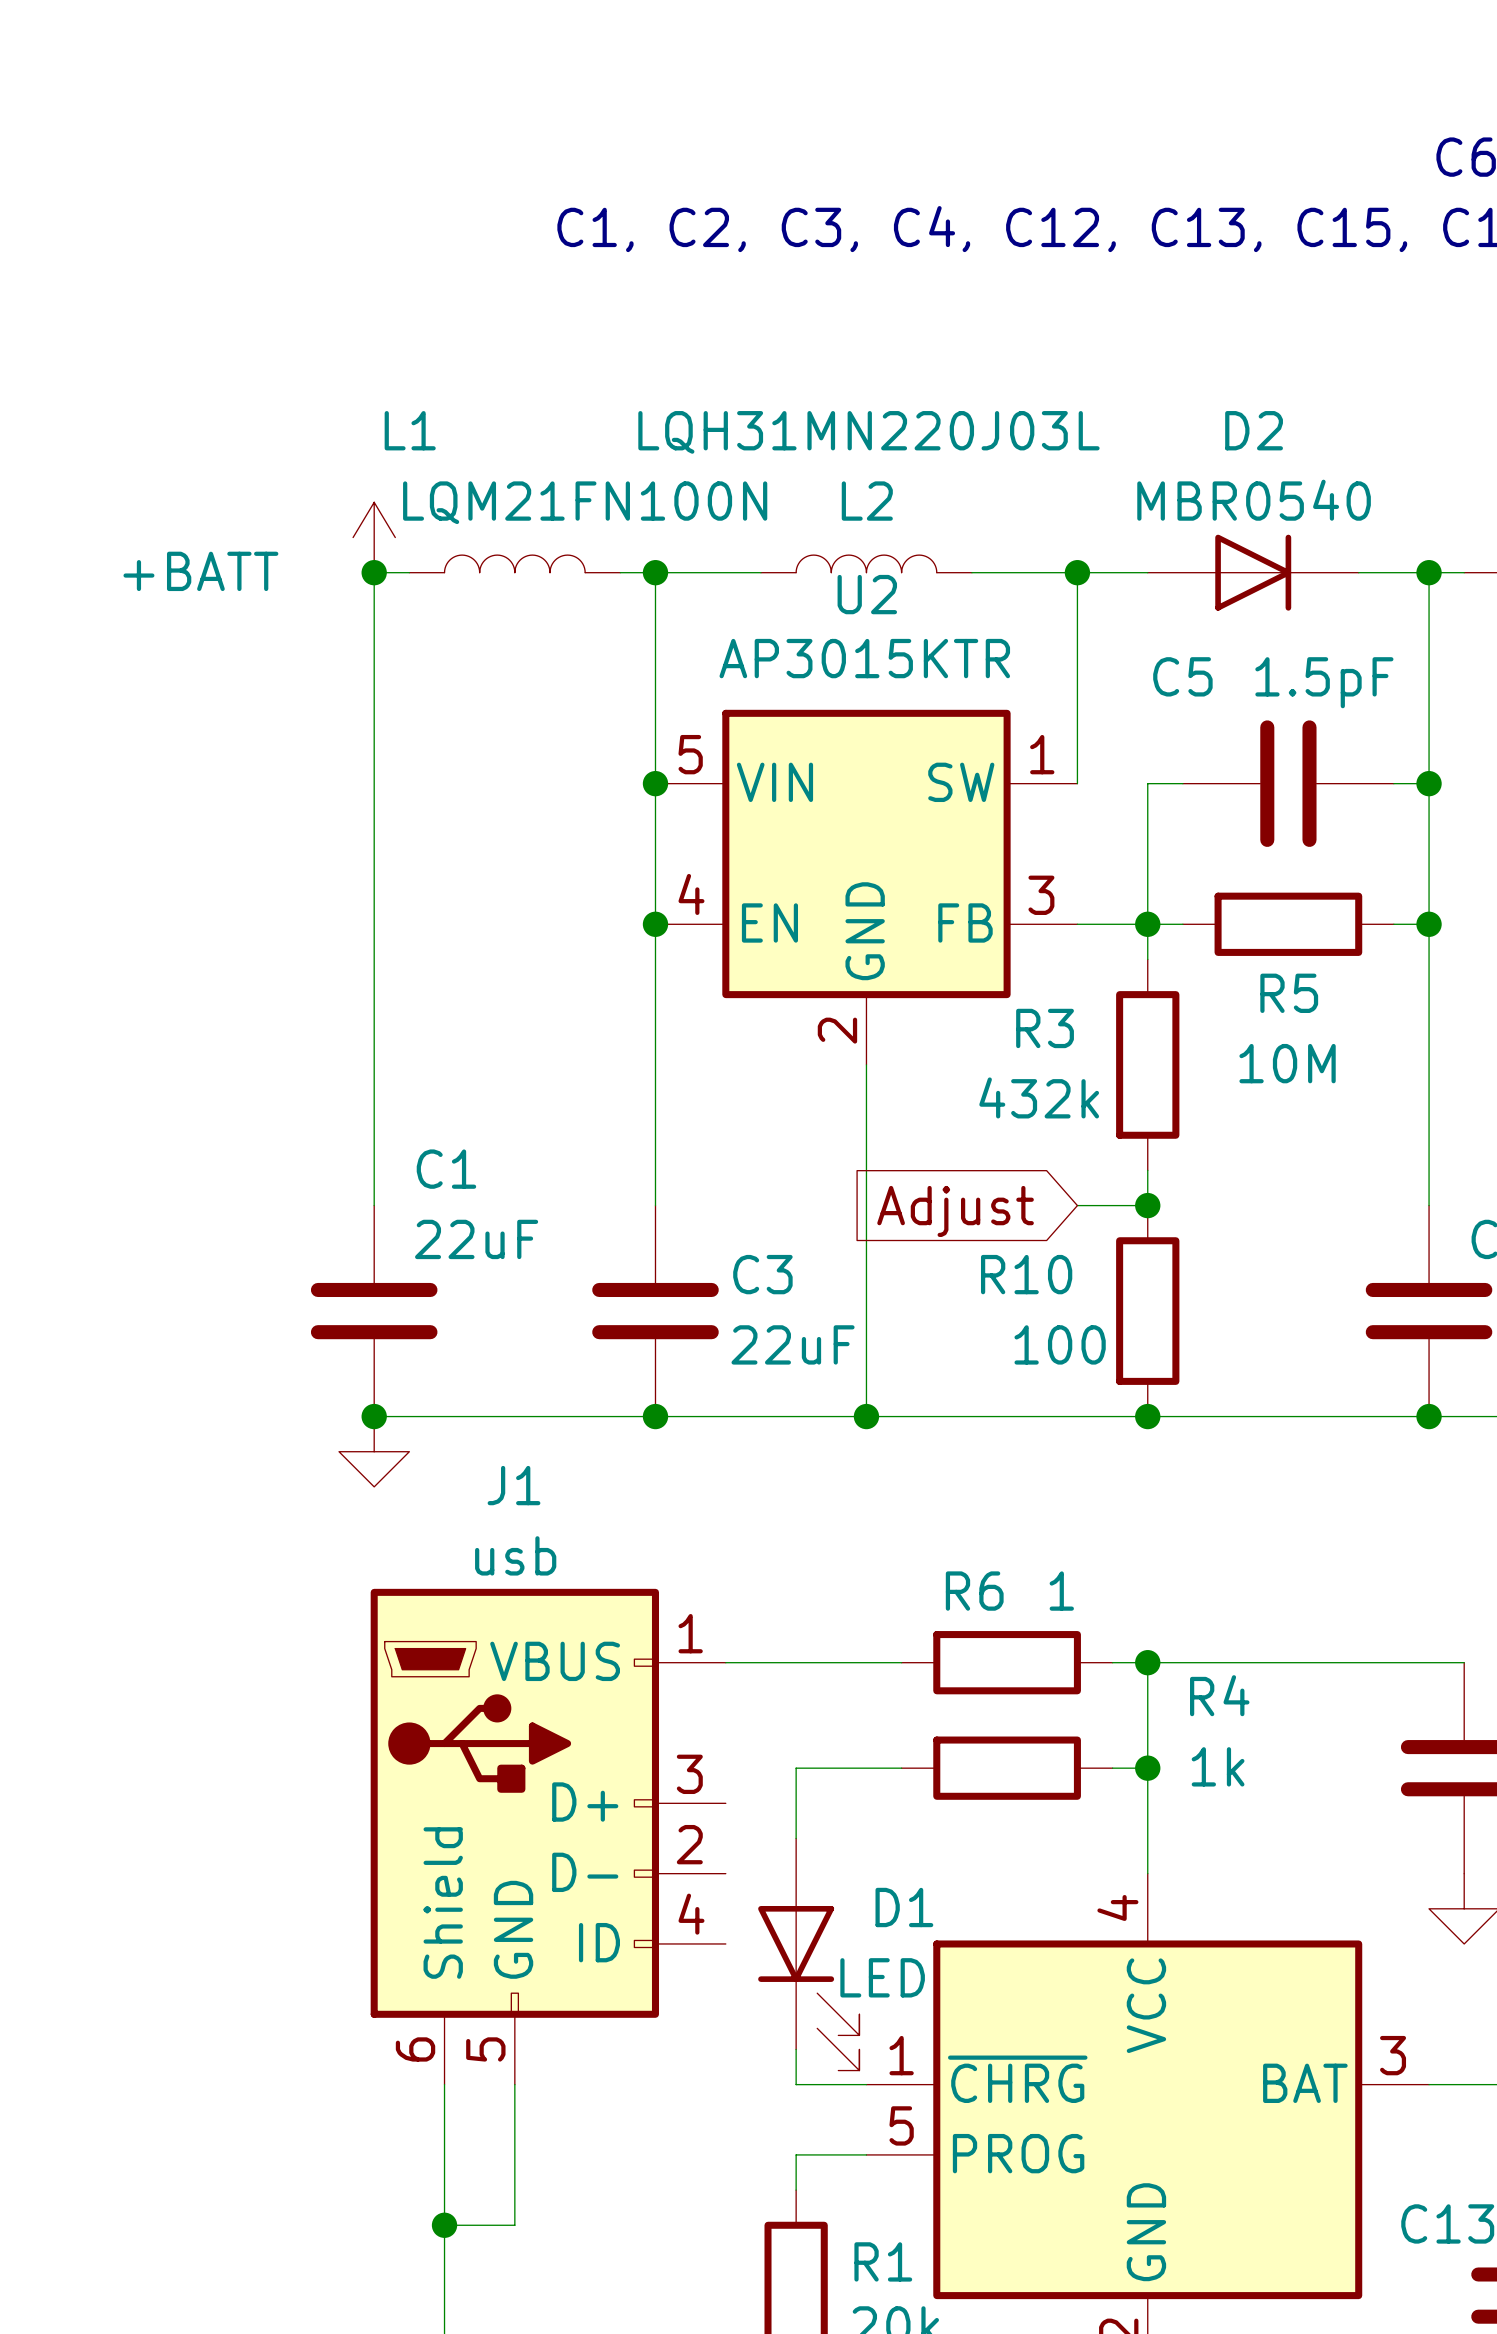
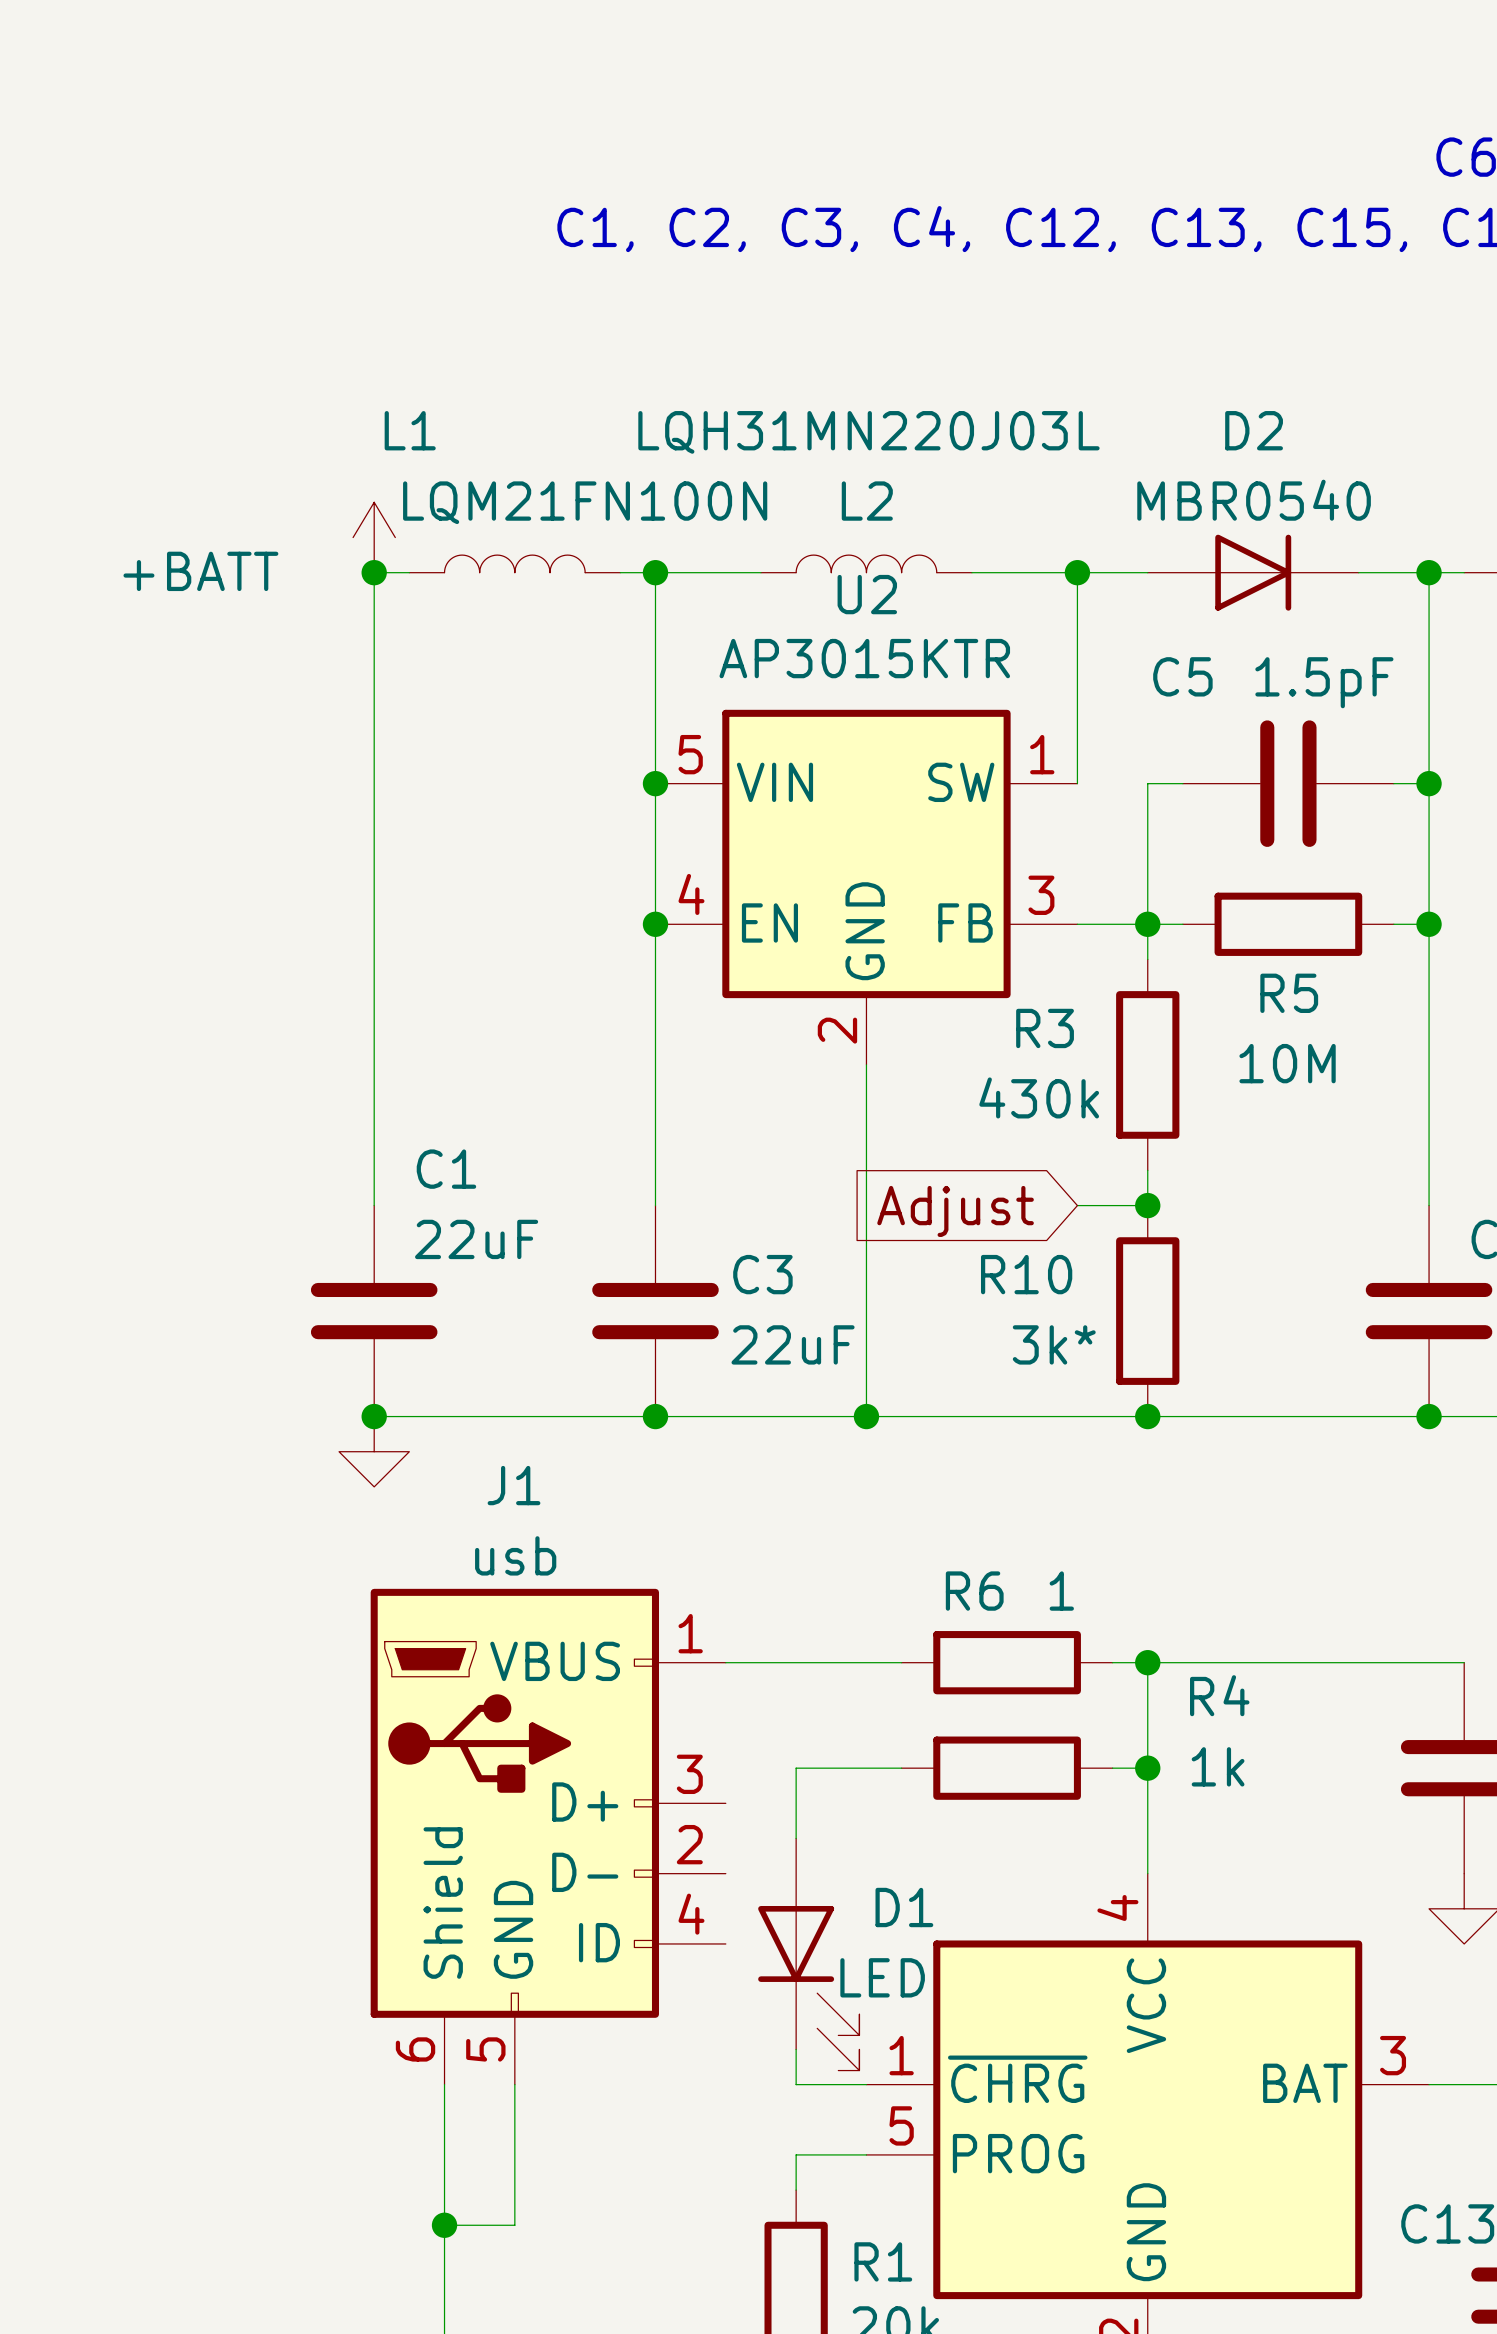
R3 value: 432k (1039, 1097) -> 430k (1039, 1097)
R10 value: 100 (1060, 1344) -> 3k* (1054, 1344)

